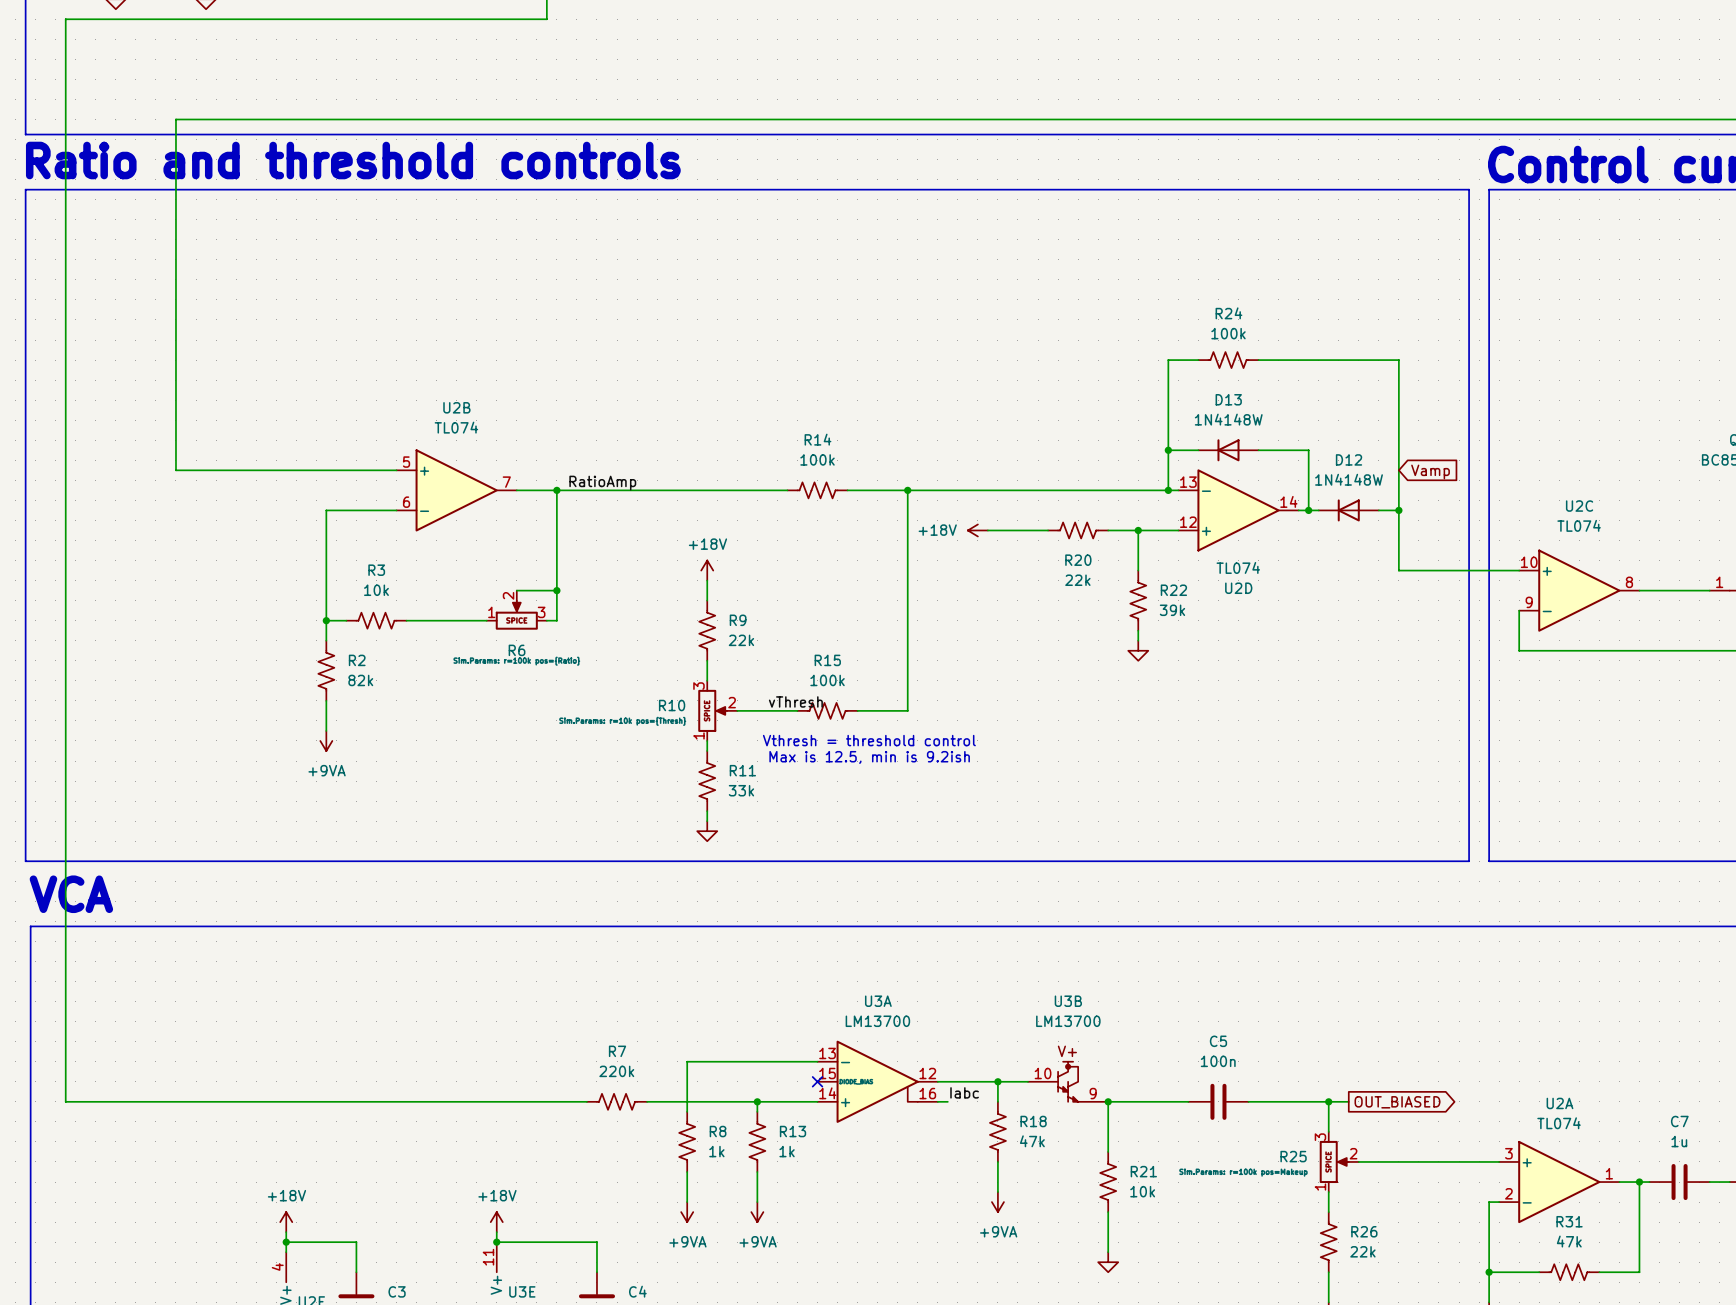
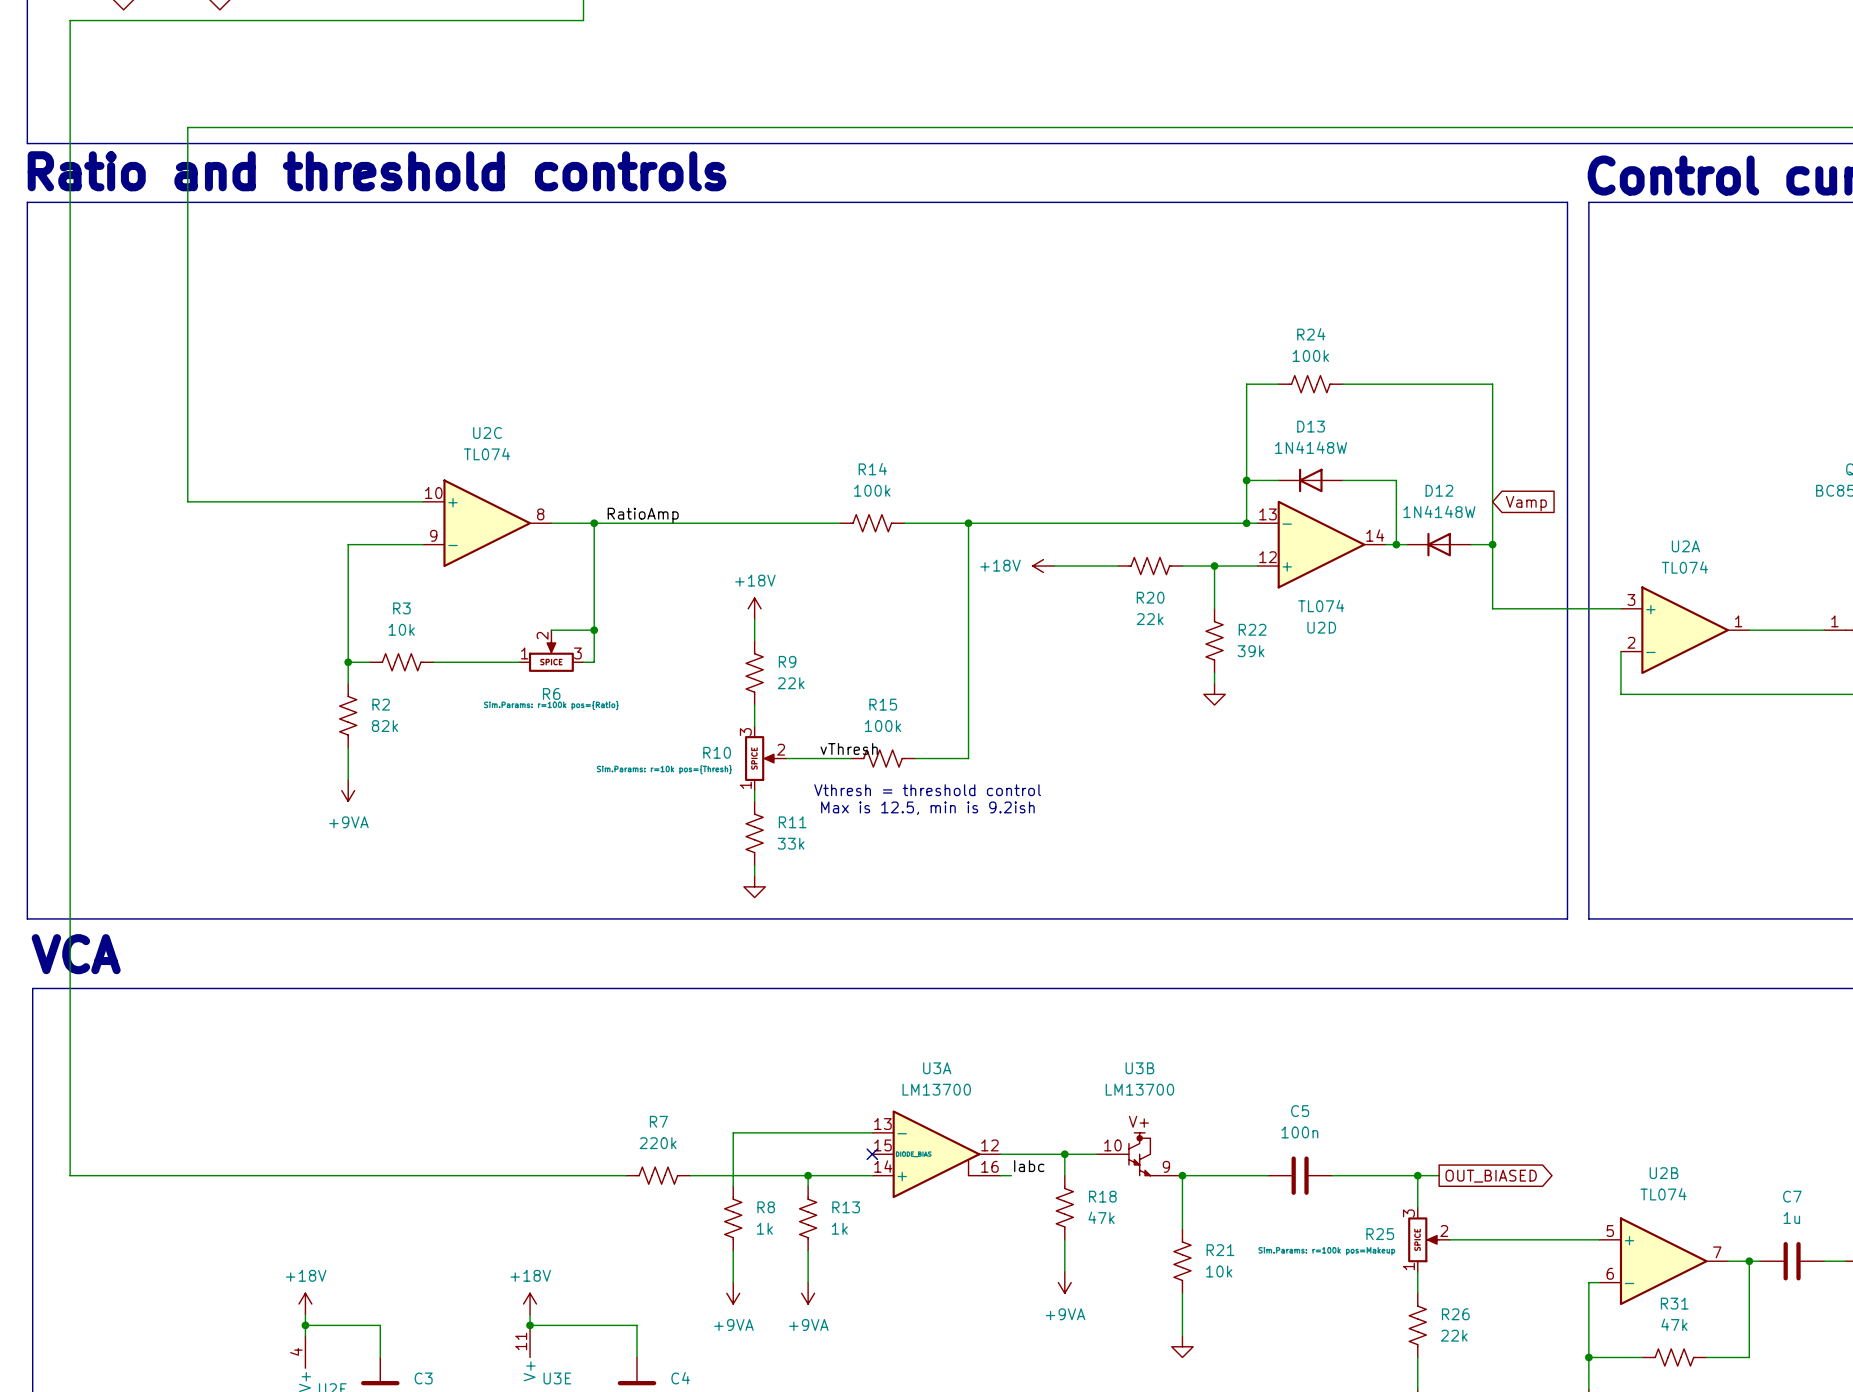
U2B position: (456, 490) -> (1663, 1261)
U2C position: (1579, 590) -> (487, 523)
U2A position: (1559, 1182) -> (1685, 630)

